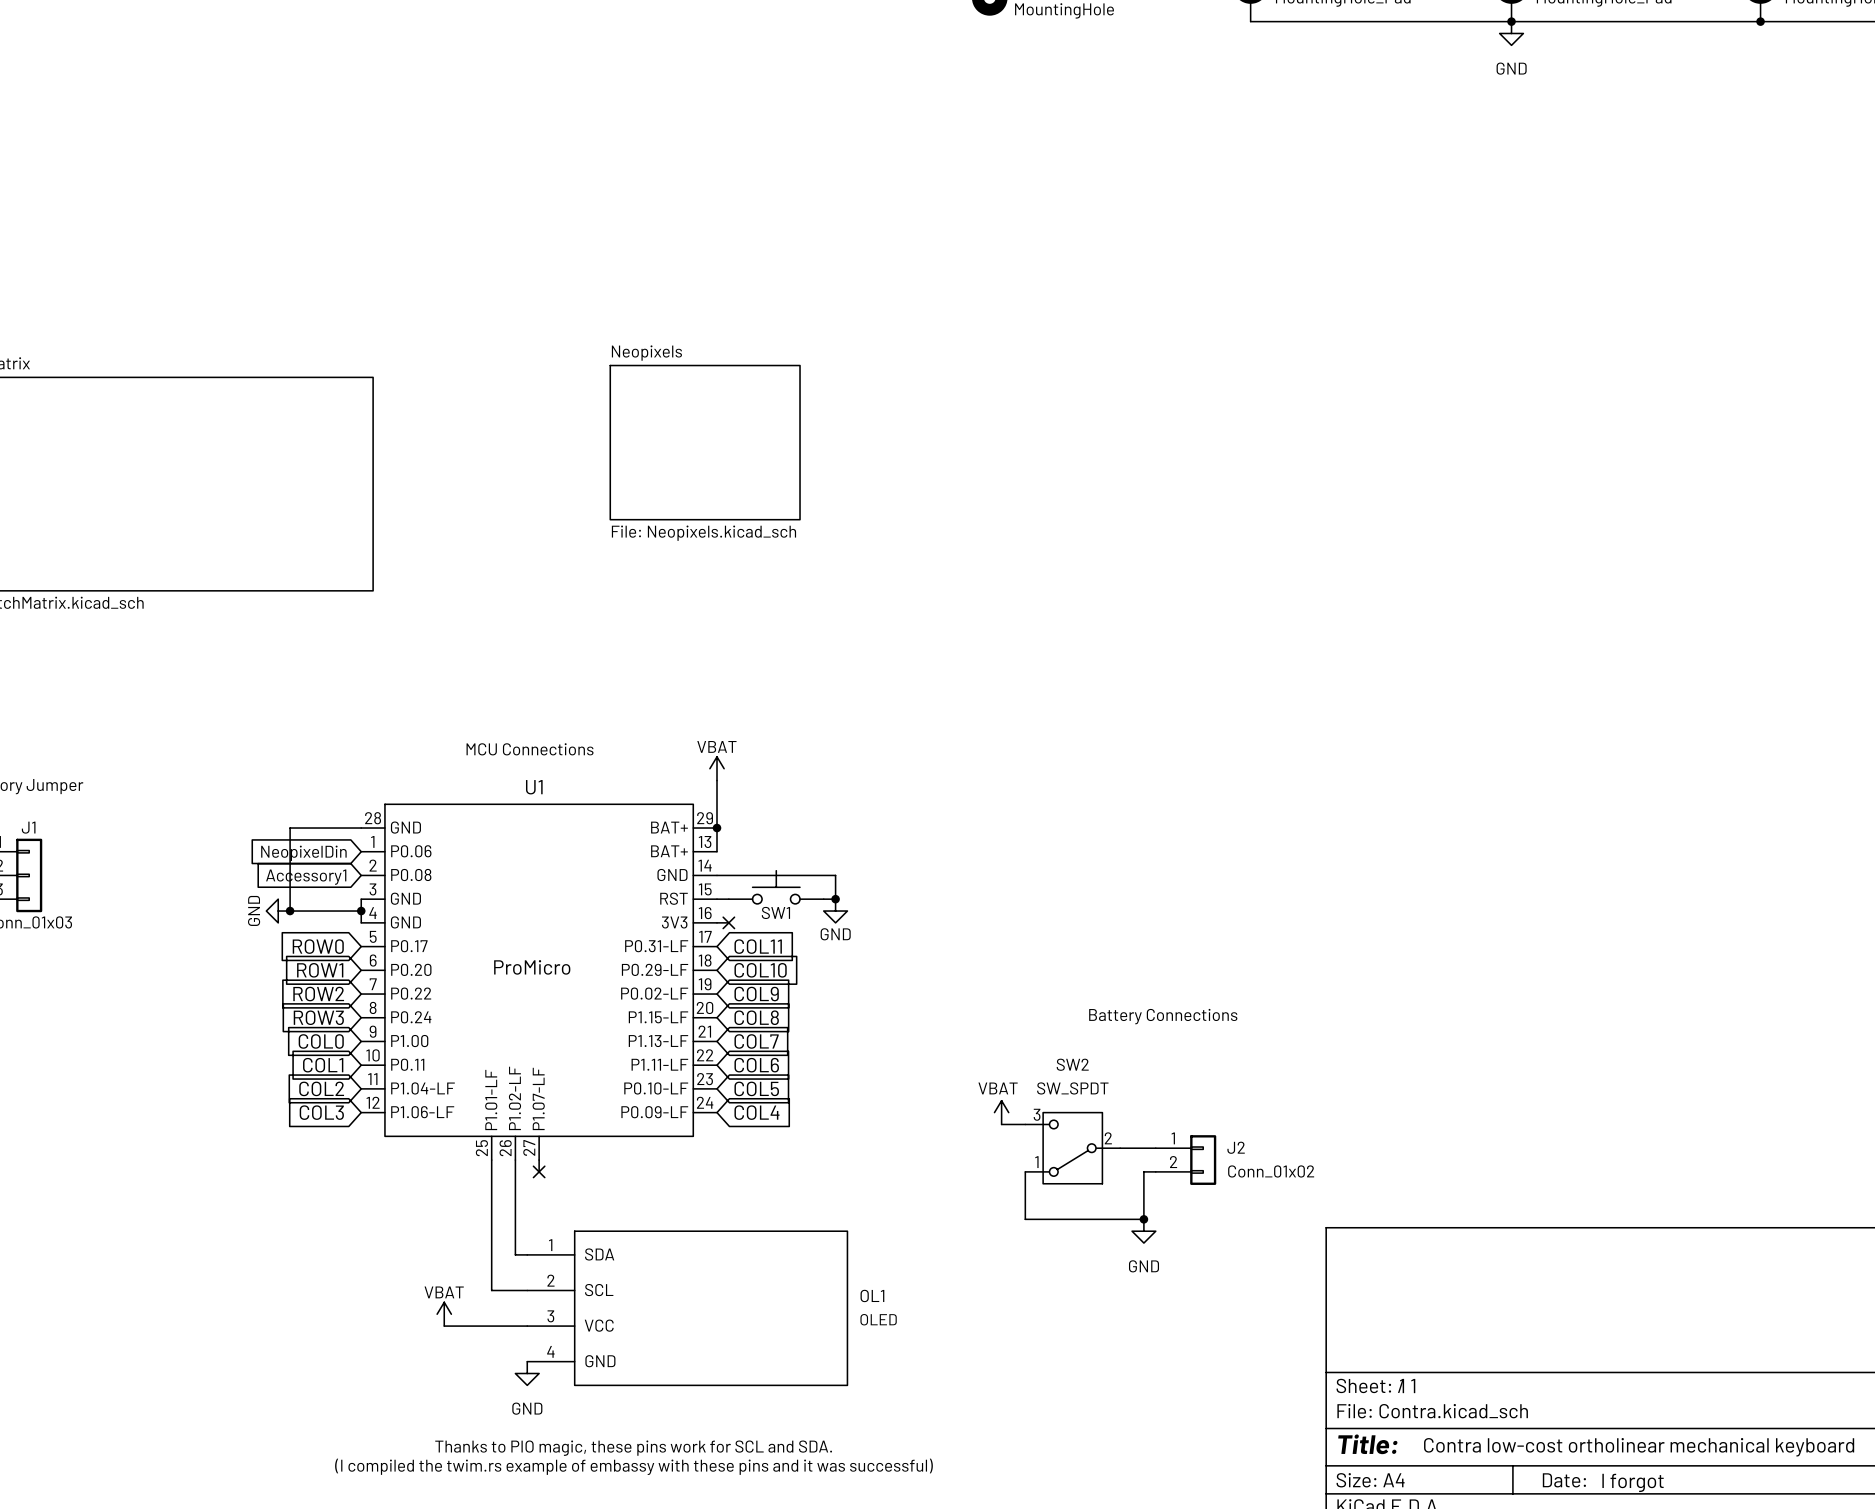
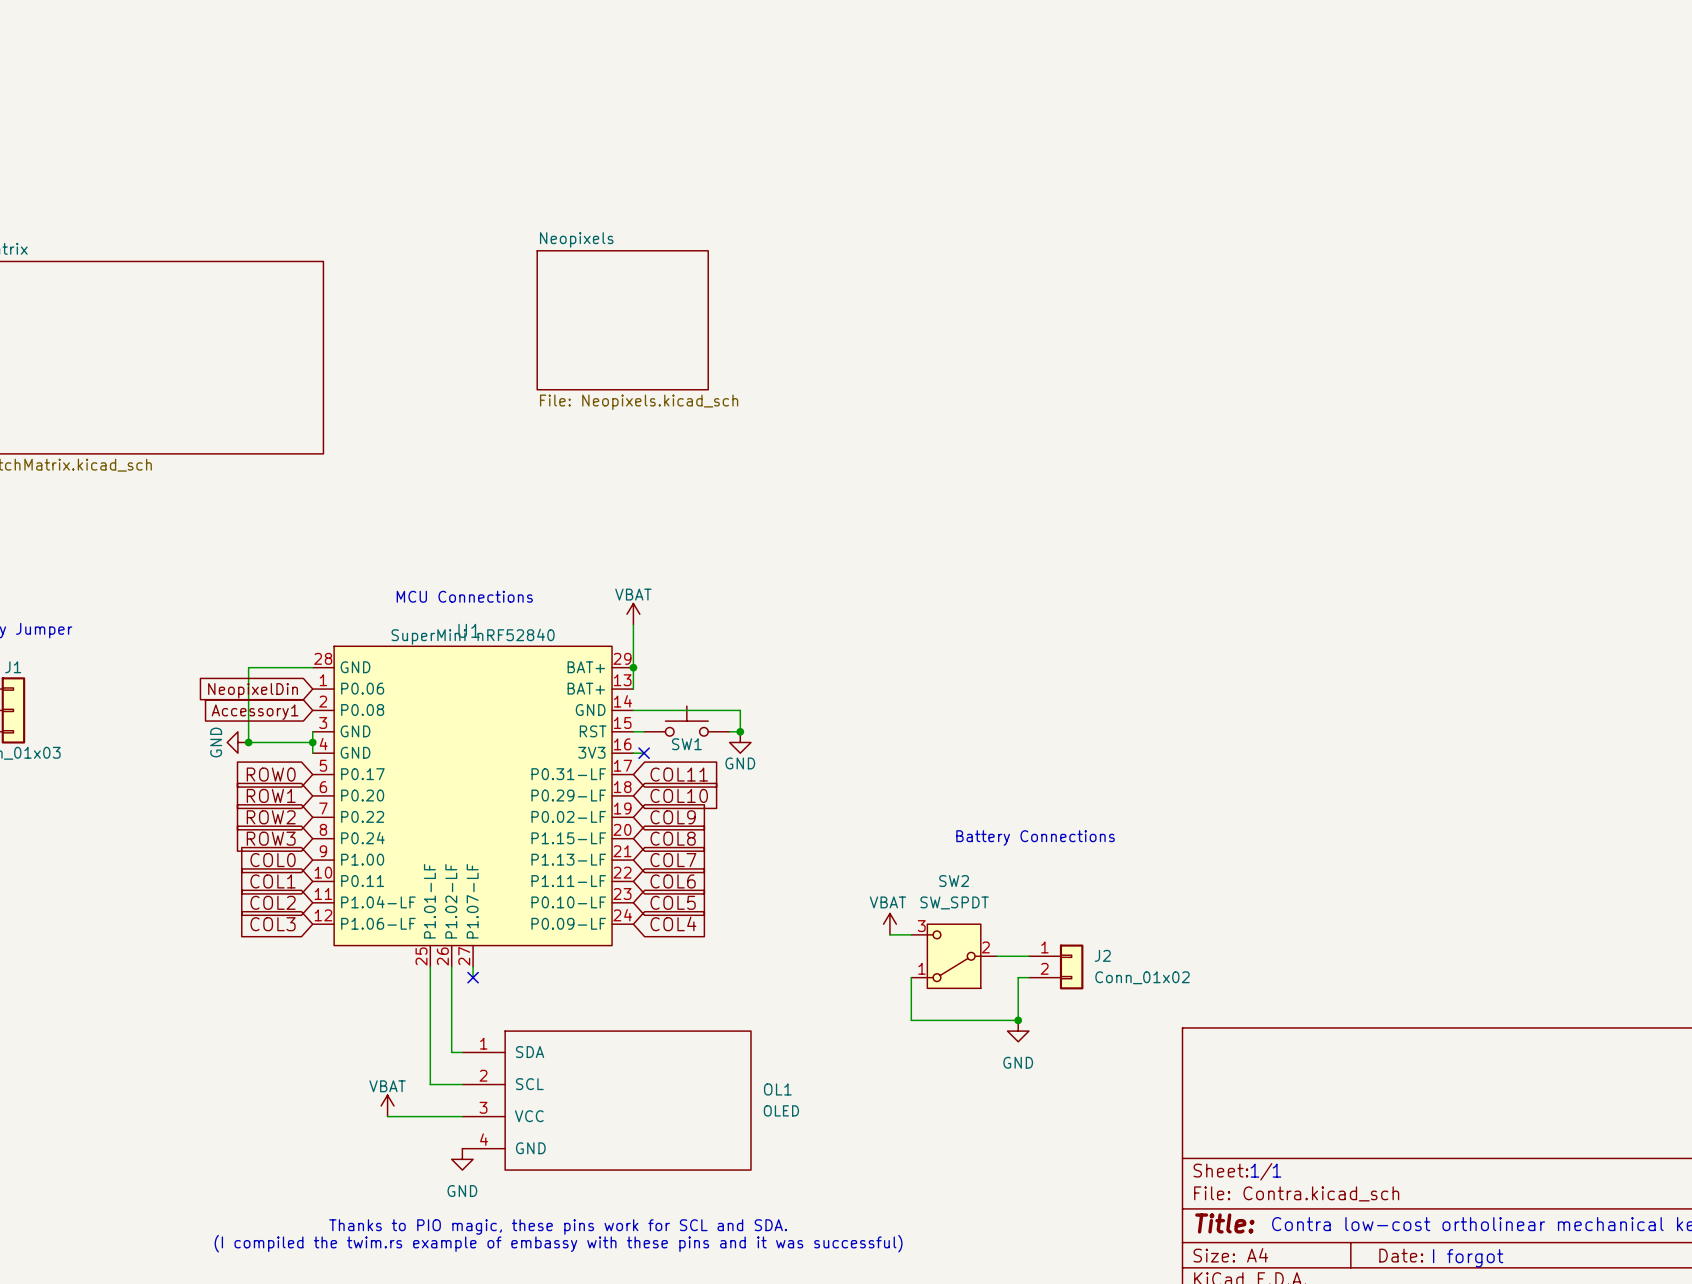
U1 value: ProMicro (532, 967) -> SuperMini nRF52840 (473, 636)

